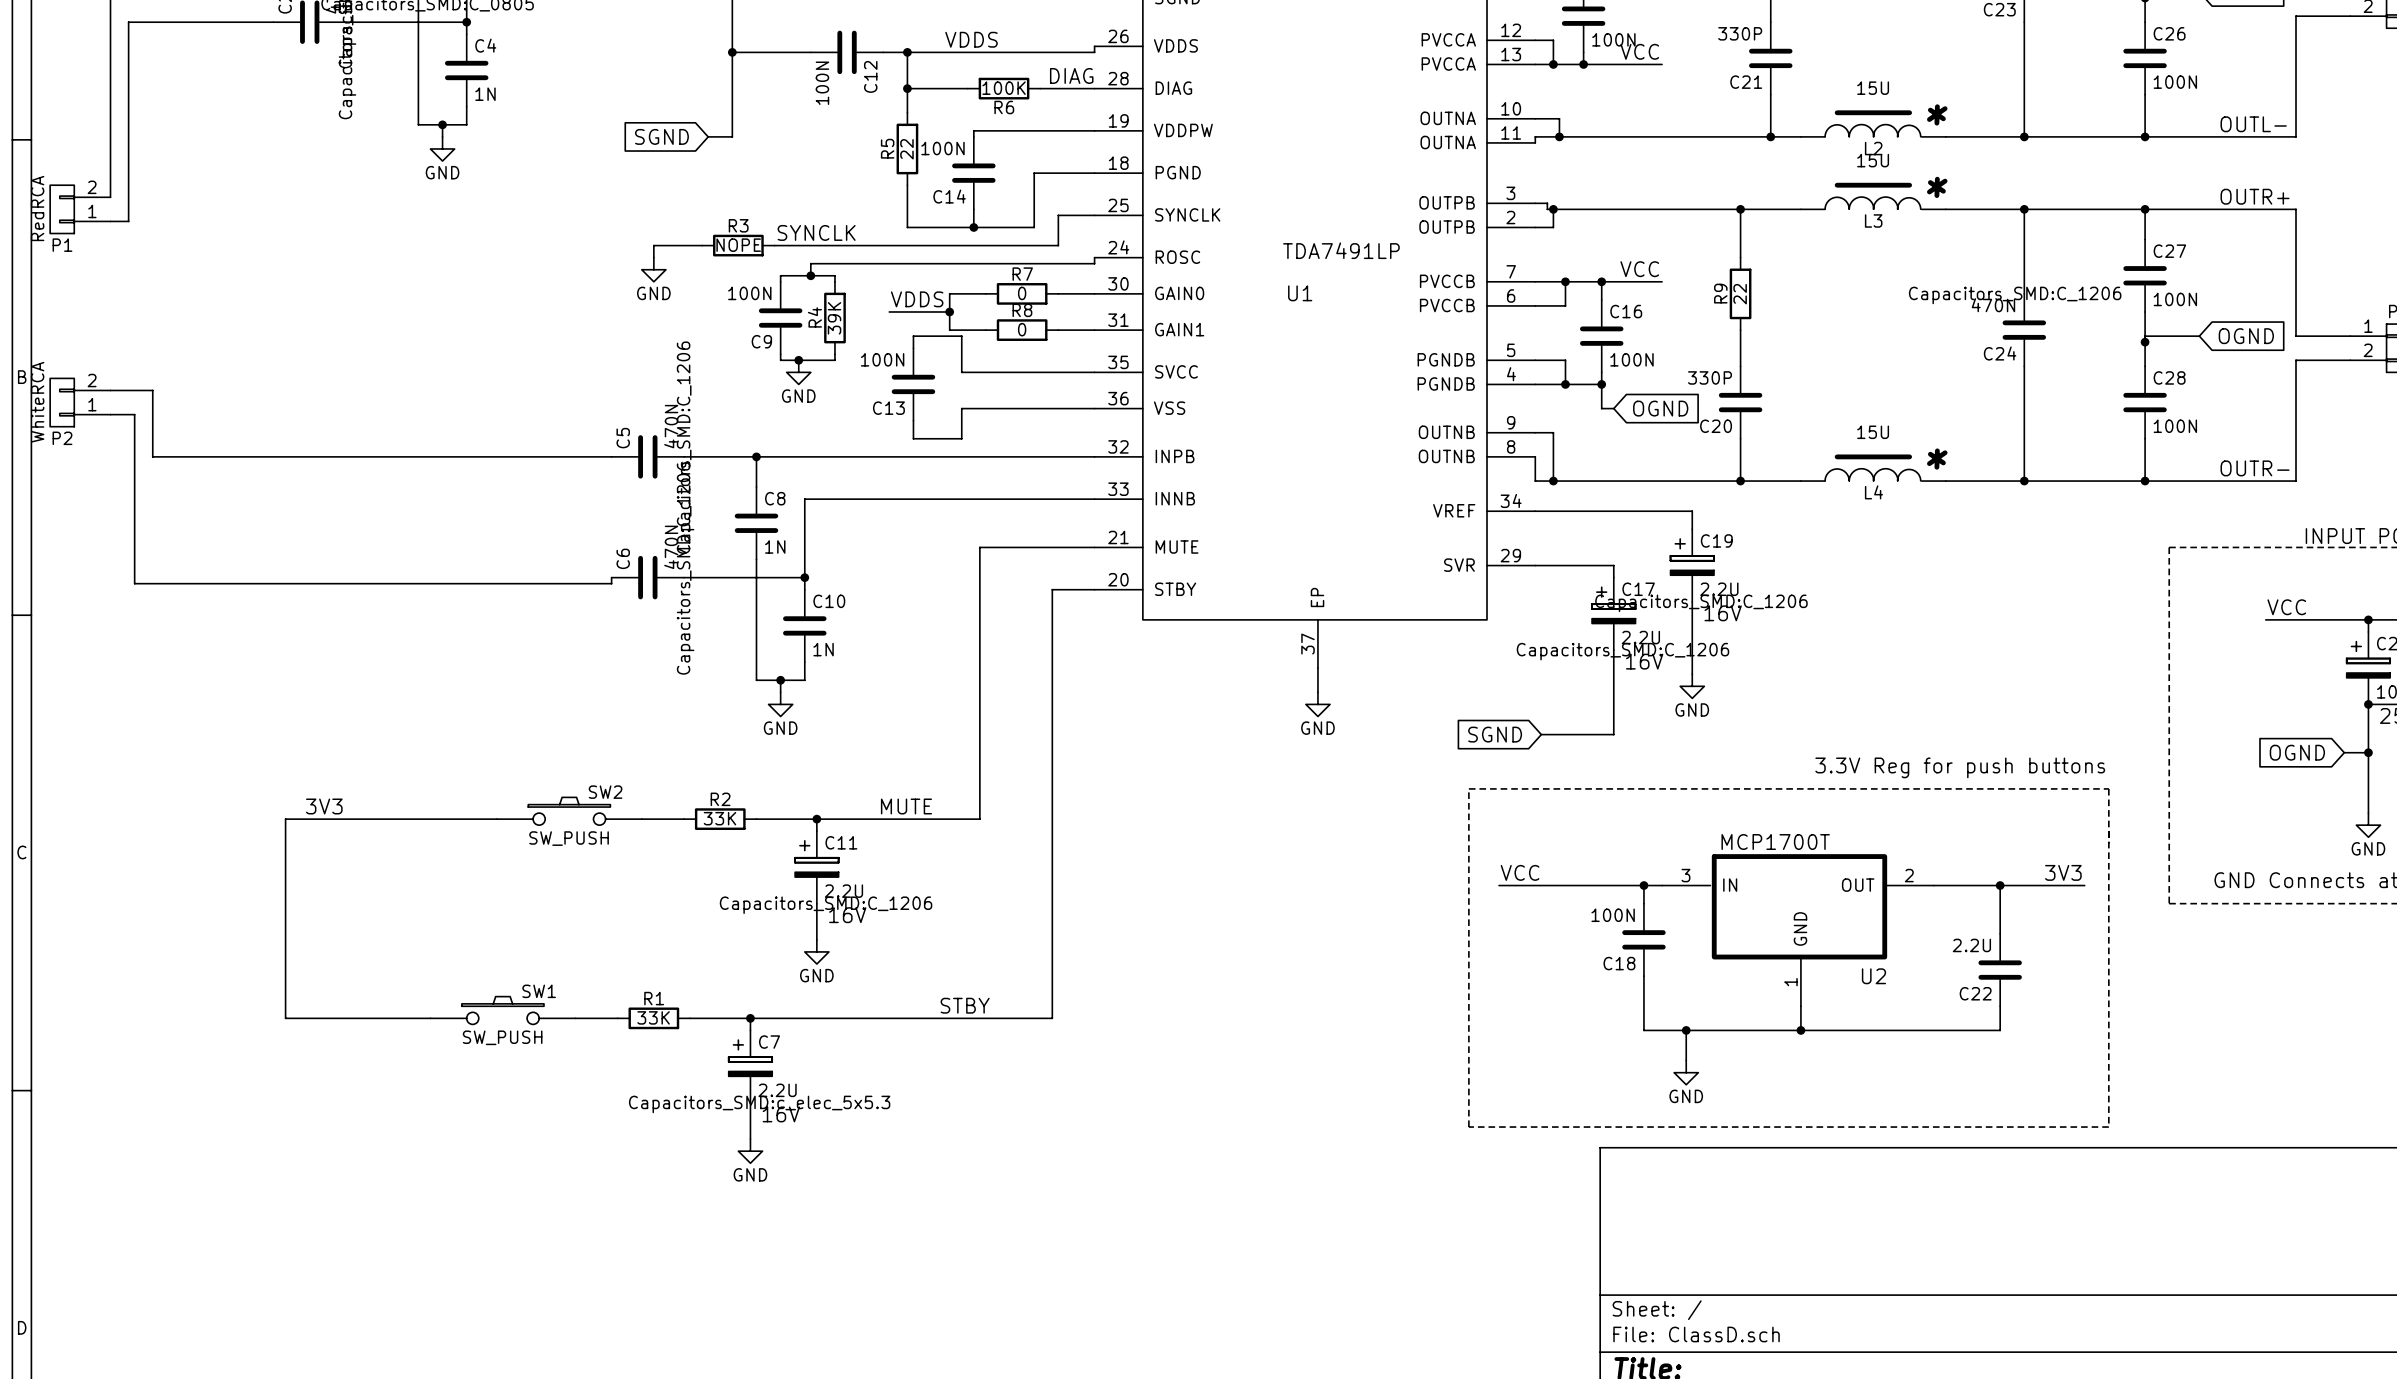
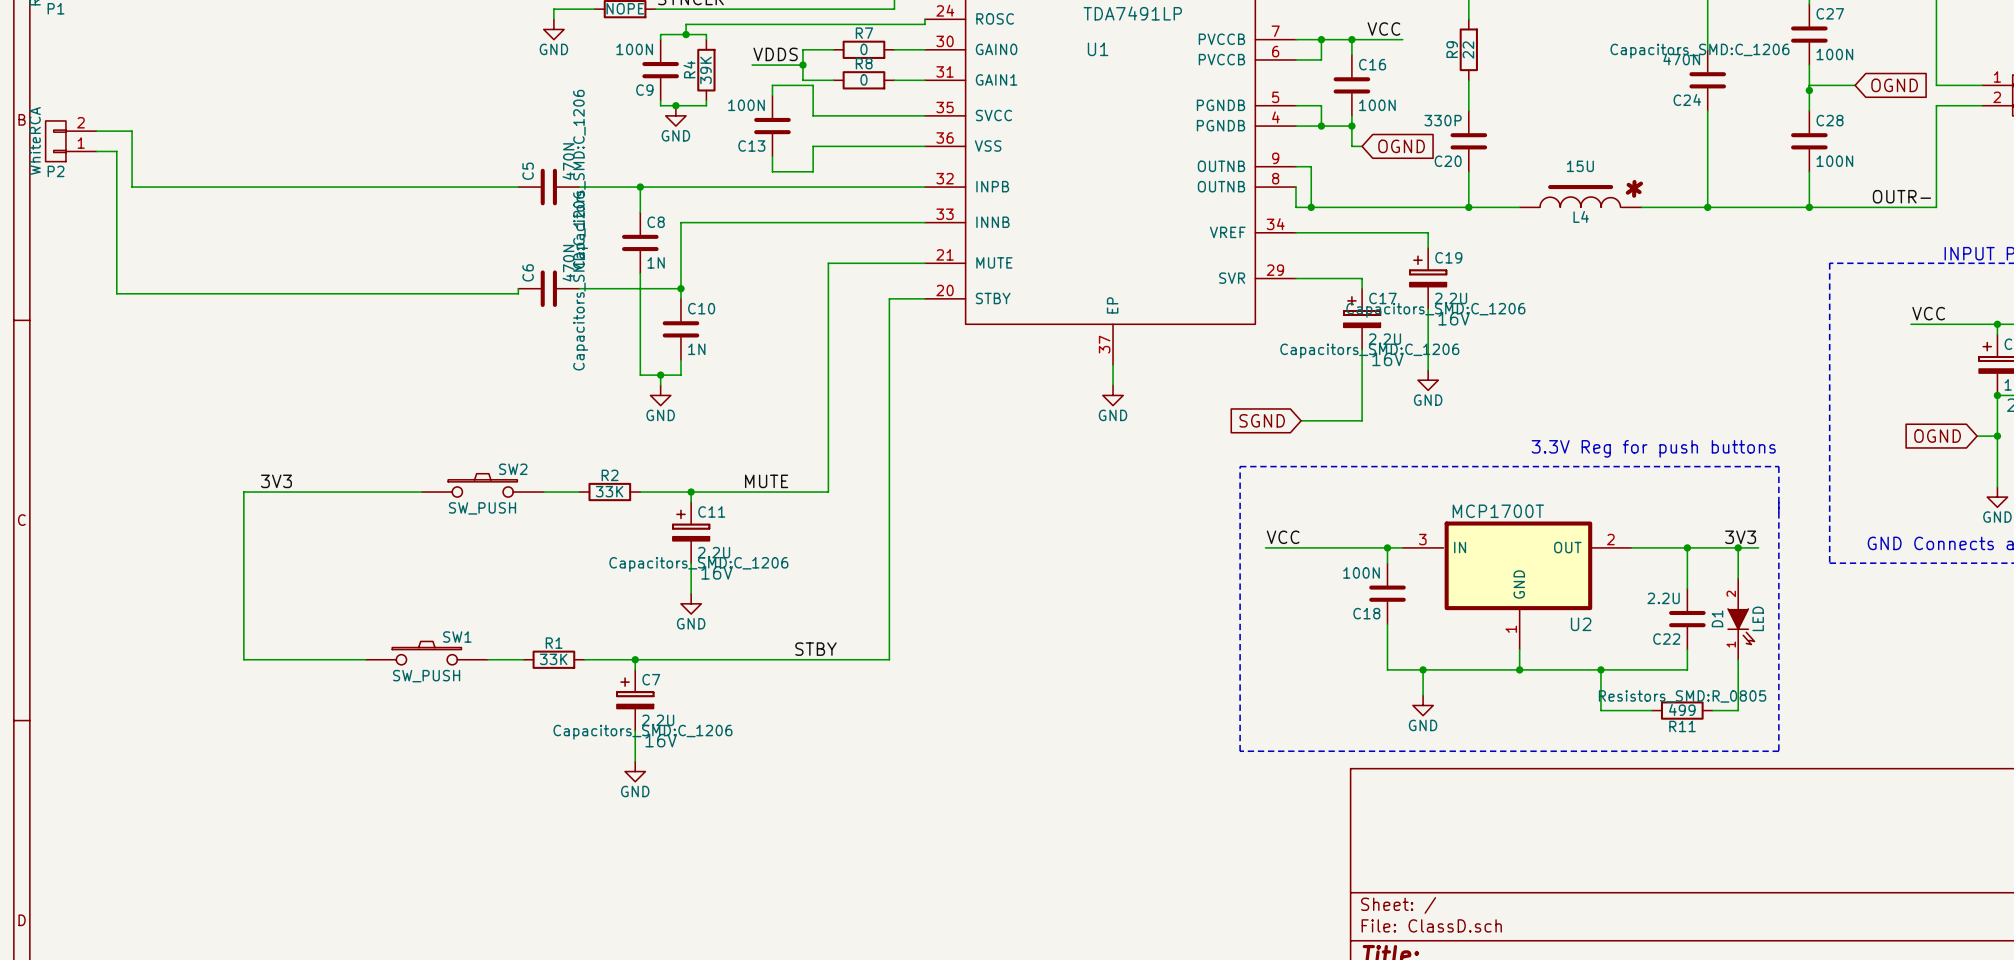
wire: none -> (1738, 547) (1738, 578)
junction: none -> (1738, 547)
D1: none -> LED (1741, 619)
wire: none -> (1738, 659) (1738, 710) (1712, 710)
wire: none -> (1600, 669) (1600, 710) (1651, 710)
junction: none -> (1600, 669)
R11: none -> 499 (1682, 710)
C7 text: Capacitors_SMD:c_elec_5x5.3 (759, 1104) -> Capacitors_SMD:C_1206 (642, 732)

